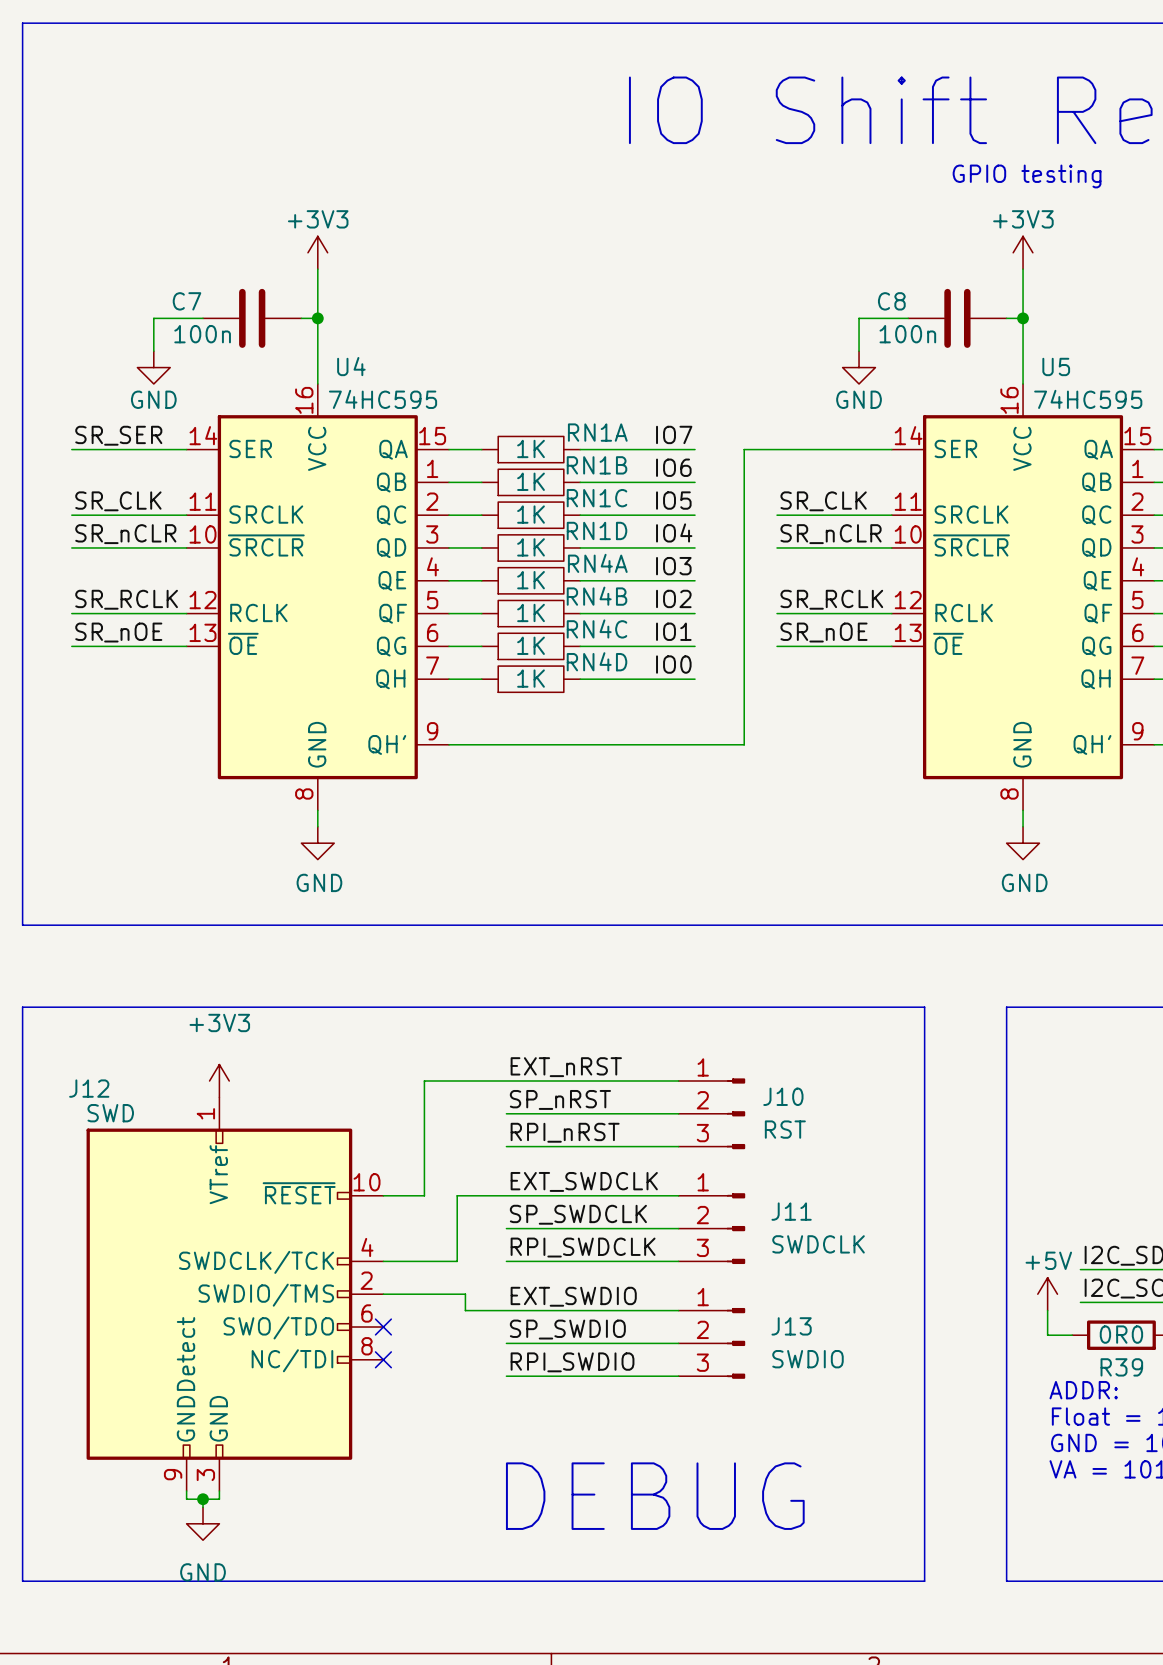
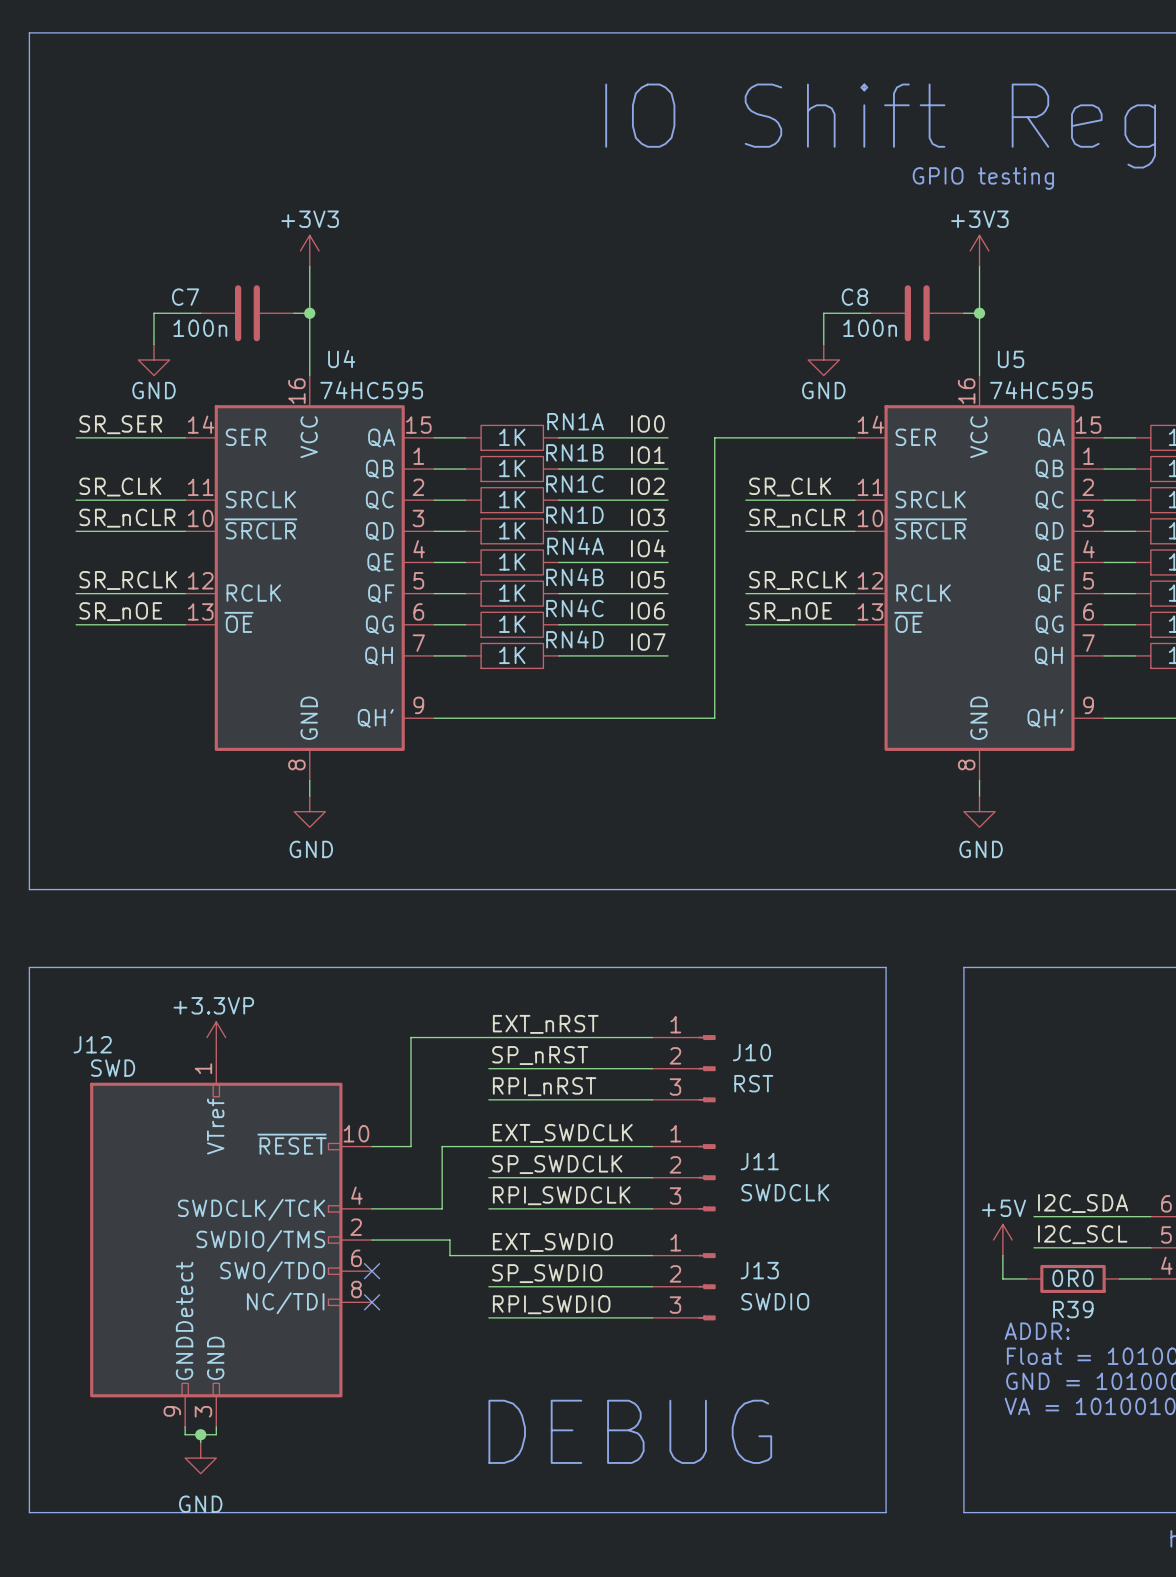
label: IO7 (674, 434) -> IO0 (647, 423)
label: IO6 (673, 467) -> IO1 (647, 455)
label: IO5 (673, 500) -> IO2 (647, 486)
label: IO4 (674, 532) -> IO3 (647, 517)
label: IO3 (673, 566) -> IO4 (648, 548)
label: IO2 (673, 598) -> IO5 (647, 579)
label: IO1 (673, 631) -> IO6 (647, 610)
label: IO0 (673, 664) -> IO7 (648, 642)
power symbol: +3V3 (219, 1080) -> +3.3VP (216, 1037)

